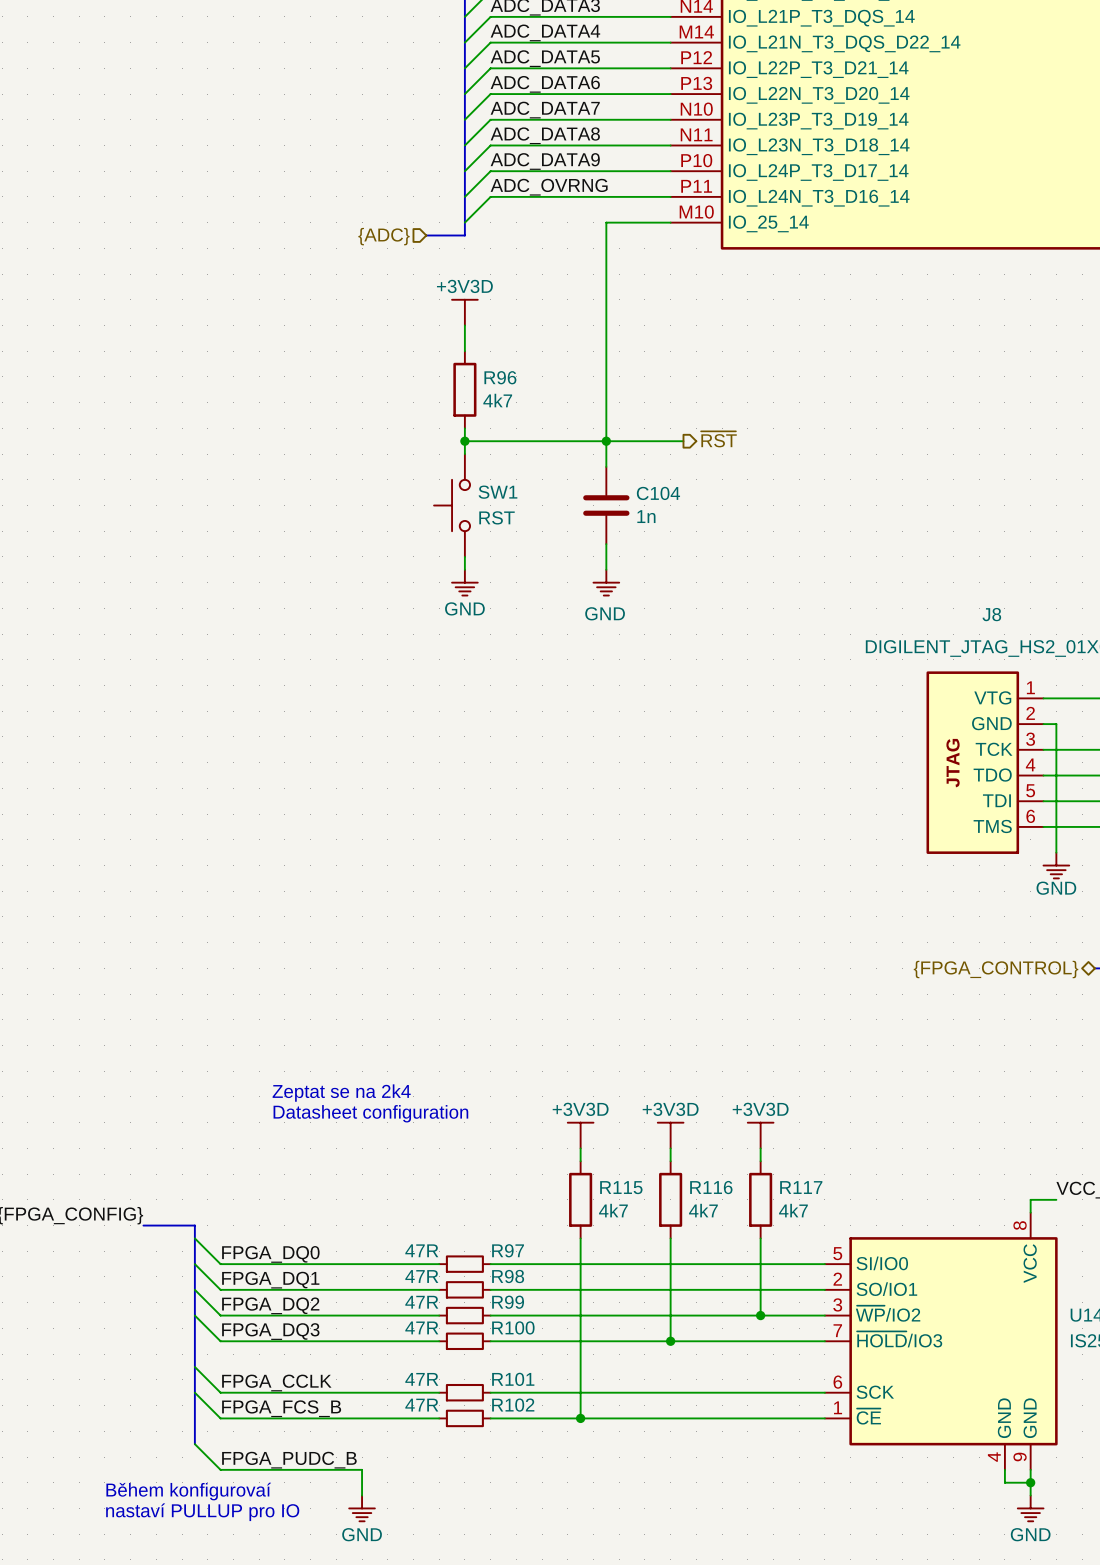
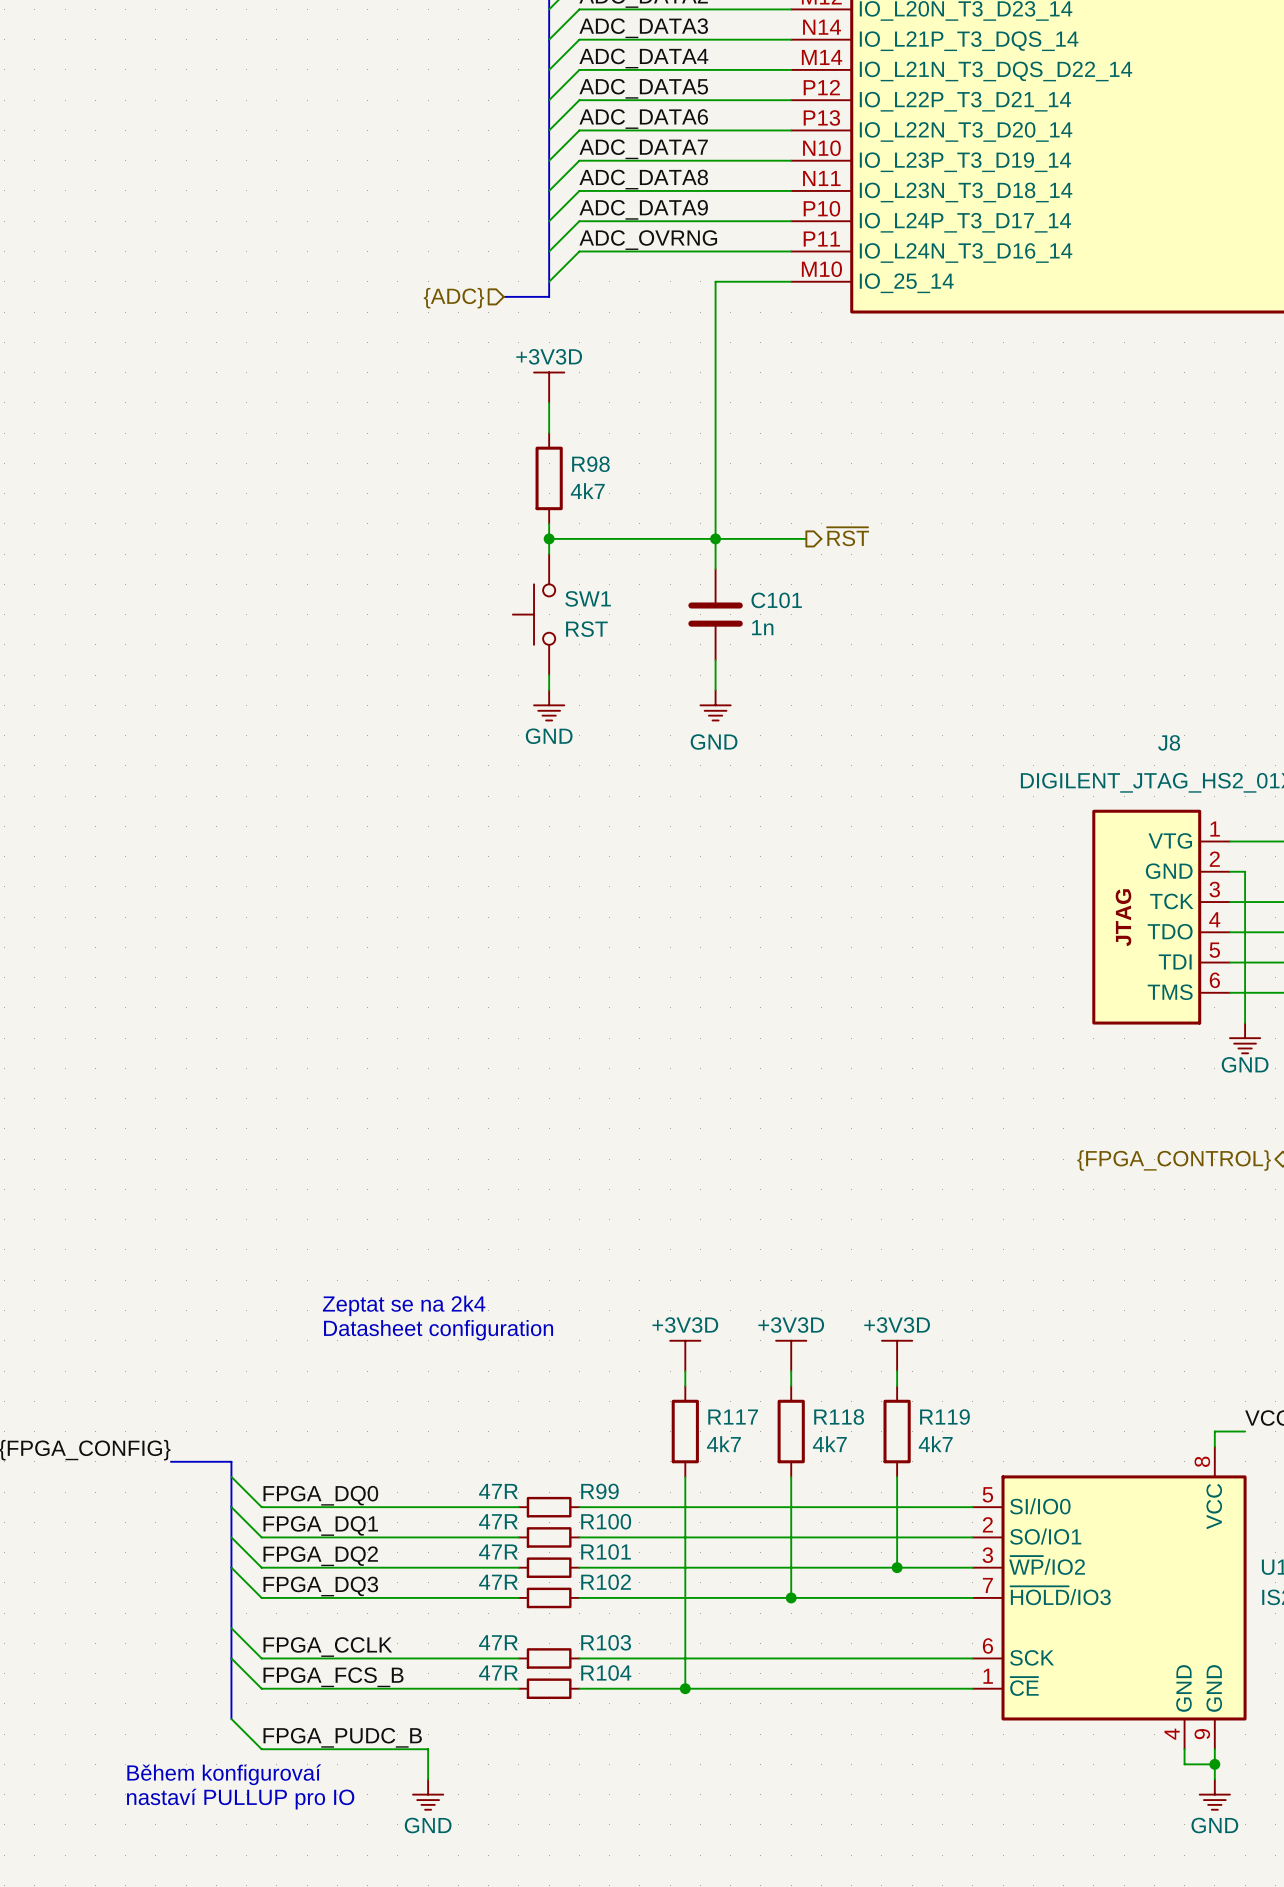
R96 name: R96 (500, 377) -> R98 (590, 464)
C104 name: C104 (658, 493) -> C101 (776, 600)
R115 name: R115 (621, 1187) -> R117 (733, 1417)
R116 name: R116 (711, 1187) -> R118 (839, 1417)
R117 name: R117 (801, 1187) -> R119 (944, 1417)
R97 name: R97 (508, 1250) -> R99 (599, 1491)
R98 name: R98 (508, 1276) -> R100 (606, 1521)
R99 name: R99 (508, 1302) -> R101 (606, 1551)
R100 name: R100 (513, 1327) -> R102 (606, 1582)
R101 name: R101 (513, 1379) -> R103 (606, 1642)
R102 name: R102 (513, 1405) -> R104 (606, 1673)

